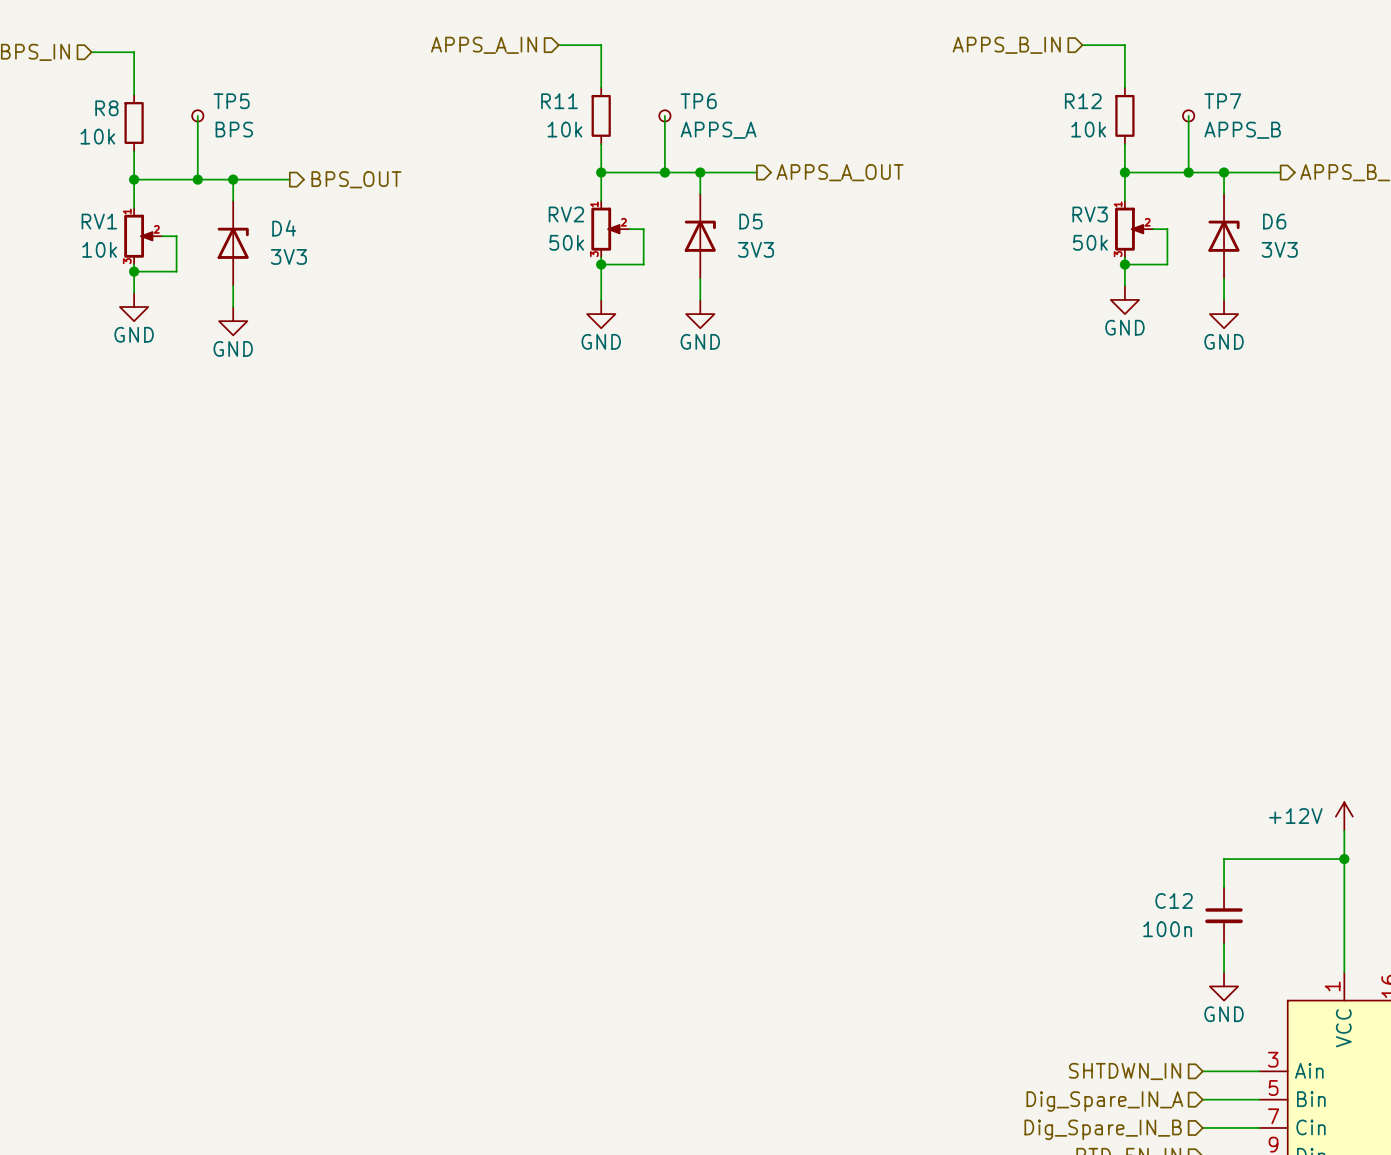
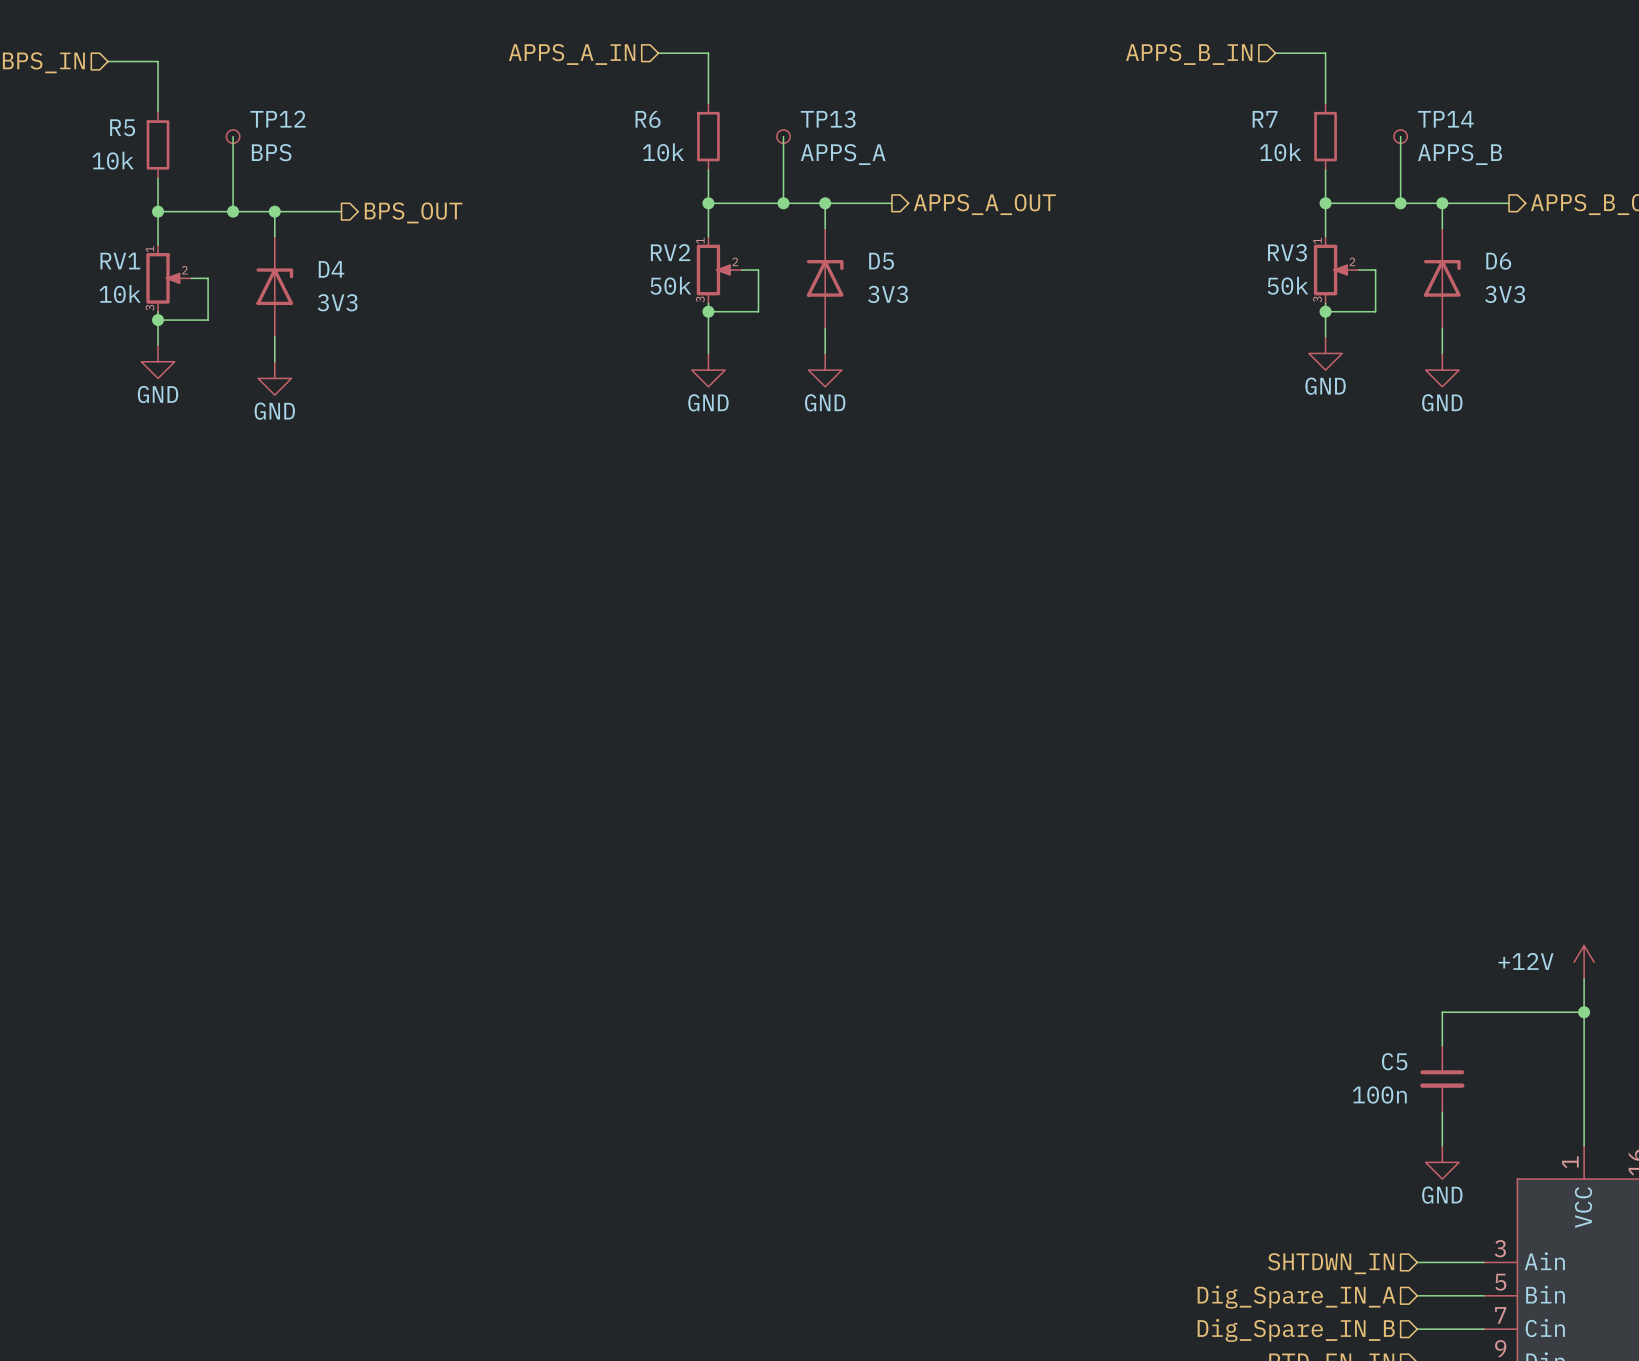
TP5 name: TP5 (231, 101) -> TP12 (277, 119)
R11 name: R11 (559, 101) -> R6 (648, 119)
TP6 name: TP6 (698, 101) -> TP13 (828, 119)
R12 name: R12 (1083, 101) -> R7 (1265, 119)
TP7 name: TP7 (1222, 101) -> TP14 (1445, 119)
R8 name: R8 (106, 108) -> R5 (122, 127)
C12 name: C12 (1174, 900) -> C5 (1394, 1061)

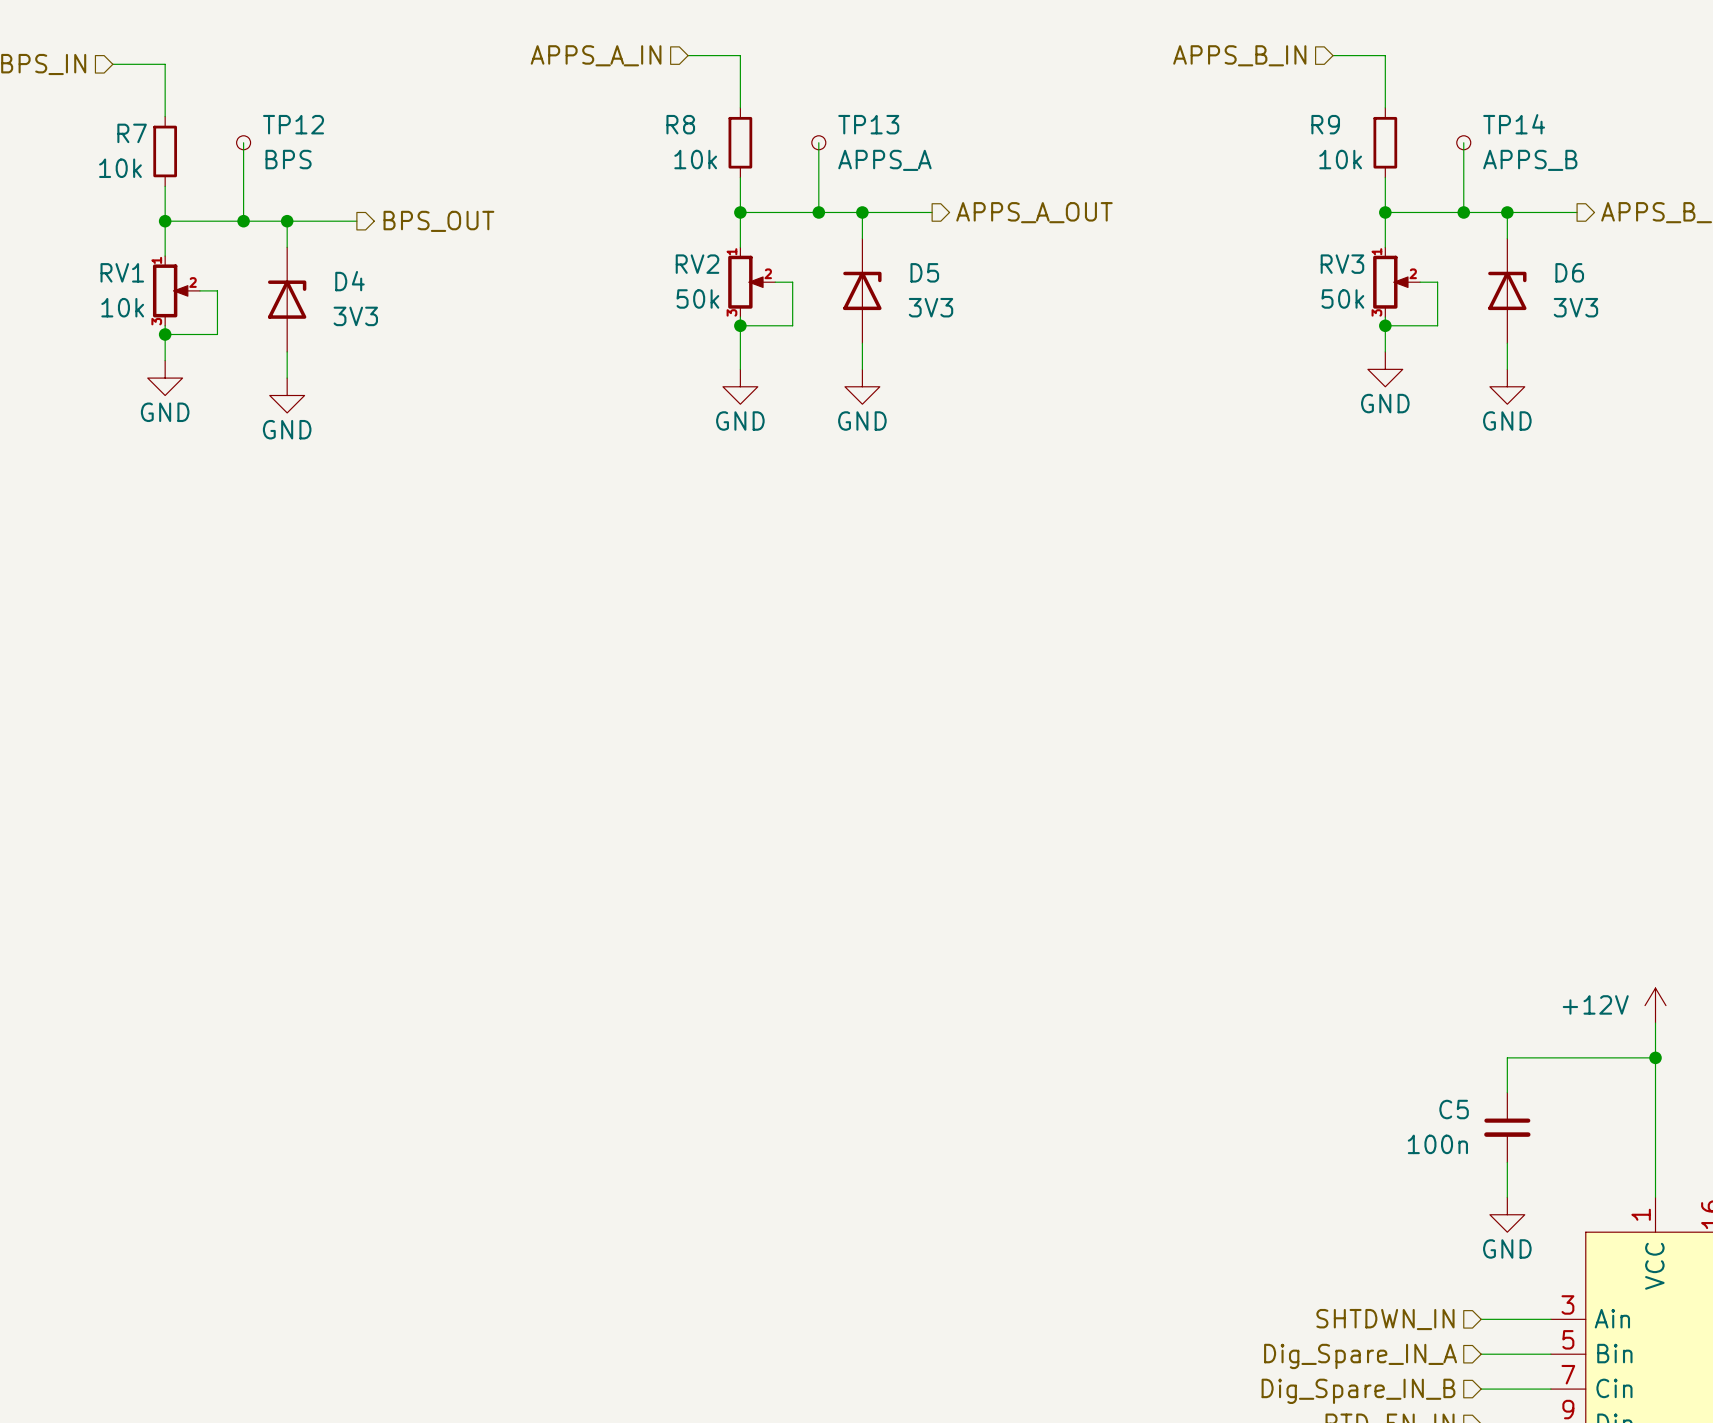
R6 name: R6 (648, 119) -> R8 (680, 124)
R7 name: R7 (1265, 119) -> R9 (1325, 124)
R5 name: R5 (122, 127) -> R7 (132, 133)

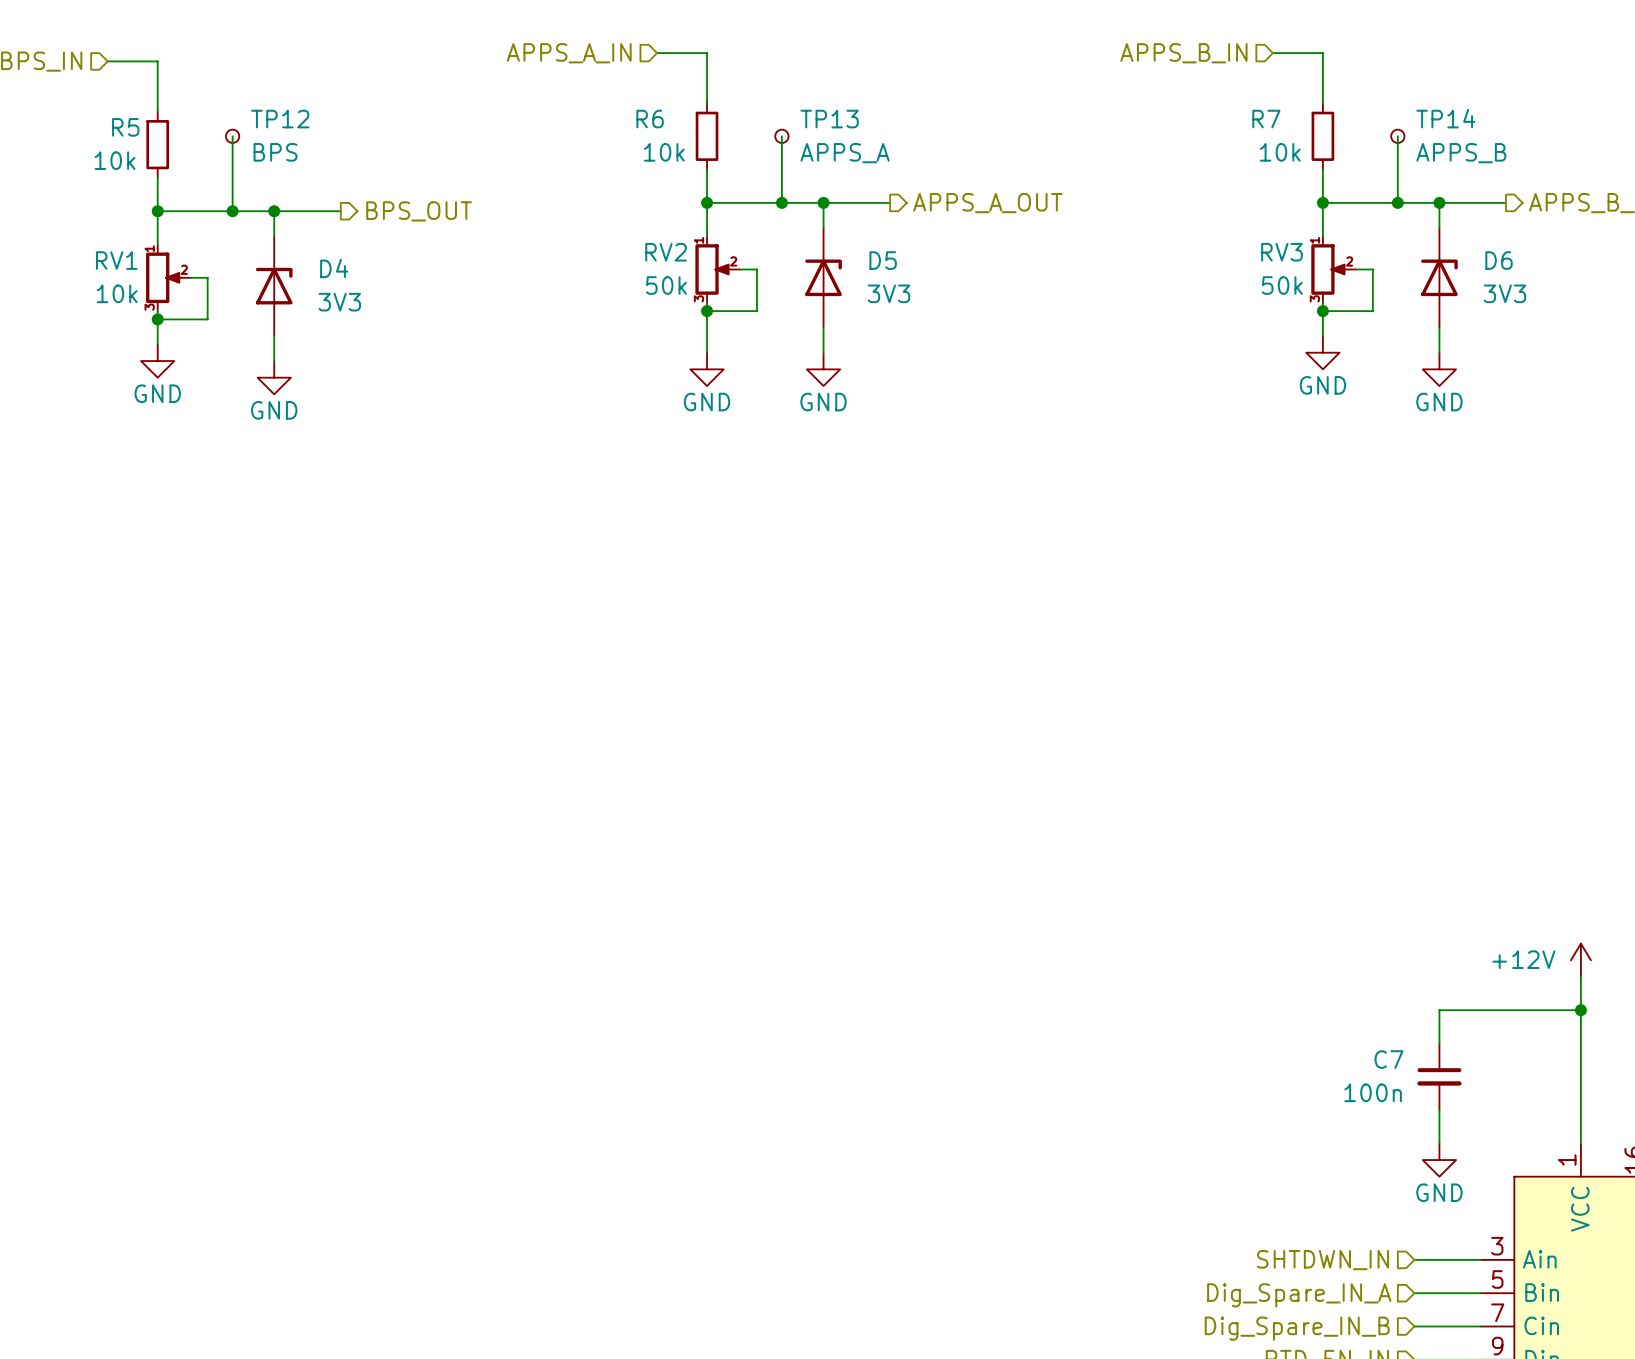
R8 name: R8 (680, 124) -> R6 (650, 119)
R9 name: R9 (1325, 124) -> R7 (1266, 119)
R7 name: R7 (132, 133) -> R5 (125, 127)
C5 name: C5 (1454, 1109) -> C7 (1388, 1059)

